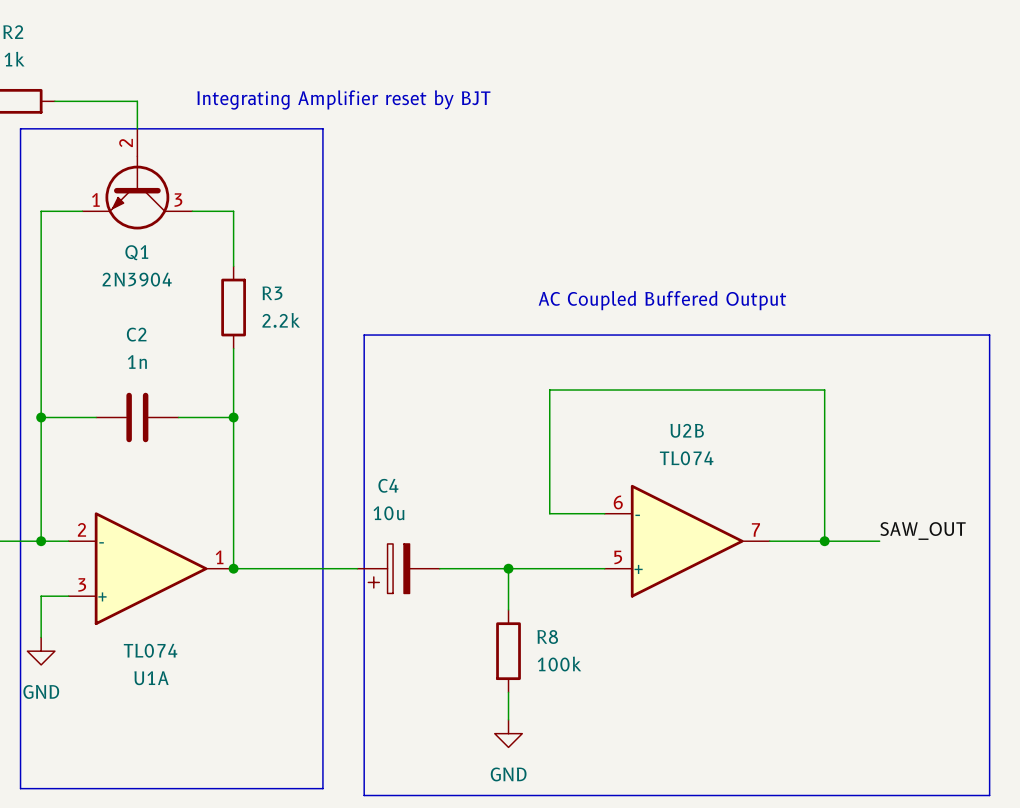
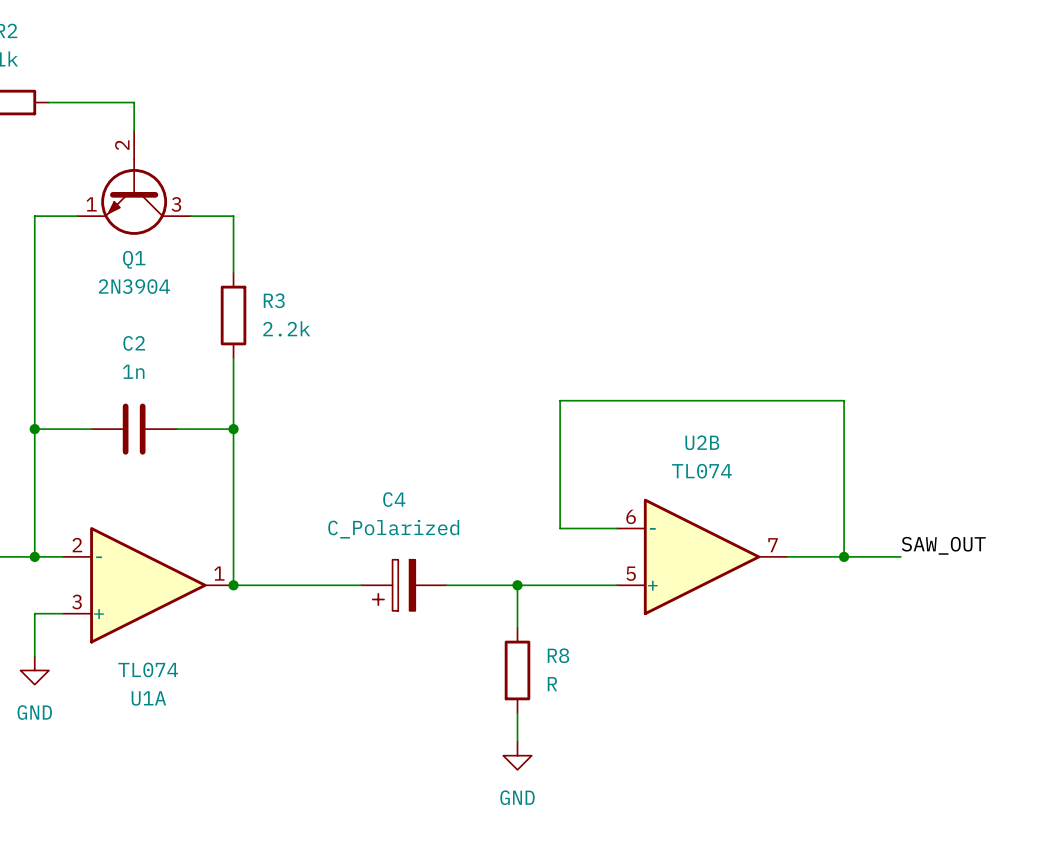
text: Integrating Amplifier reset by BJT (343, 100) -> none
line: (20, 128) (322, 128) (322, 788) (20, 788) (20, 128) -> none
text: AC Coupled Buffered Output (662, 300) -> none
line: (364, 335) (989, 335) (989, 795) (364, 795) (364, 335) -> none
C4 value: 10u (388, 513) -> C_Polarized (393, 529)
R8 value: 100k (559, 664) -> R (552, 684)

